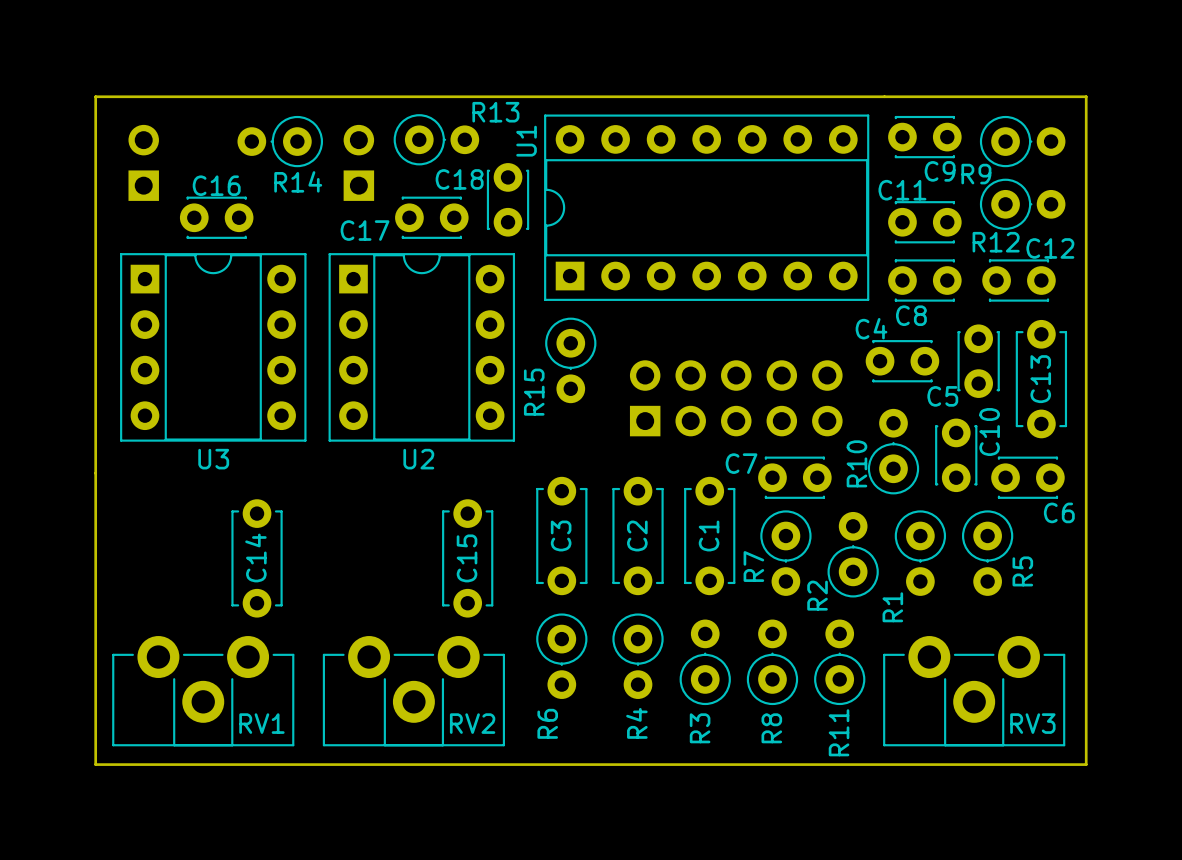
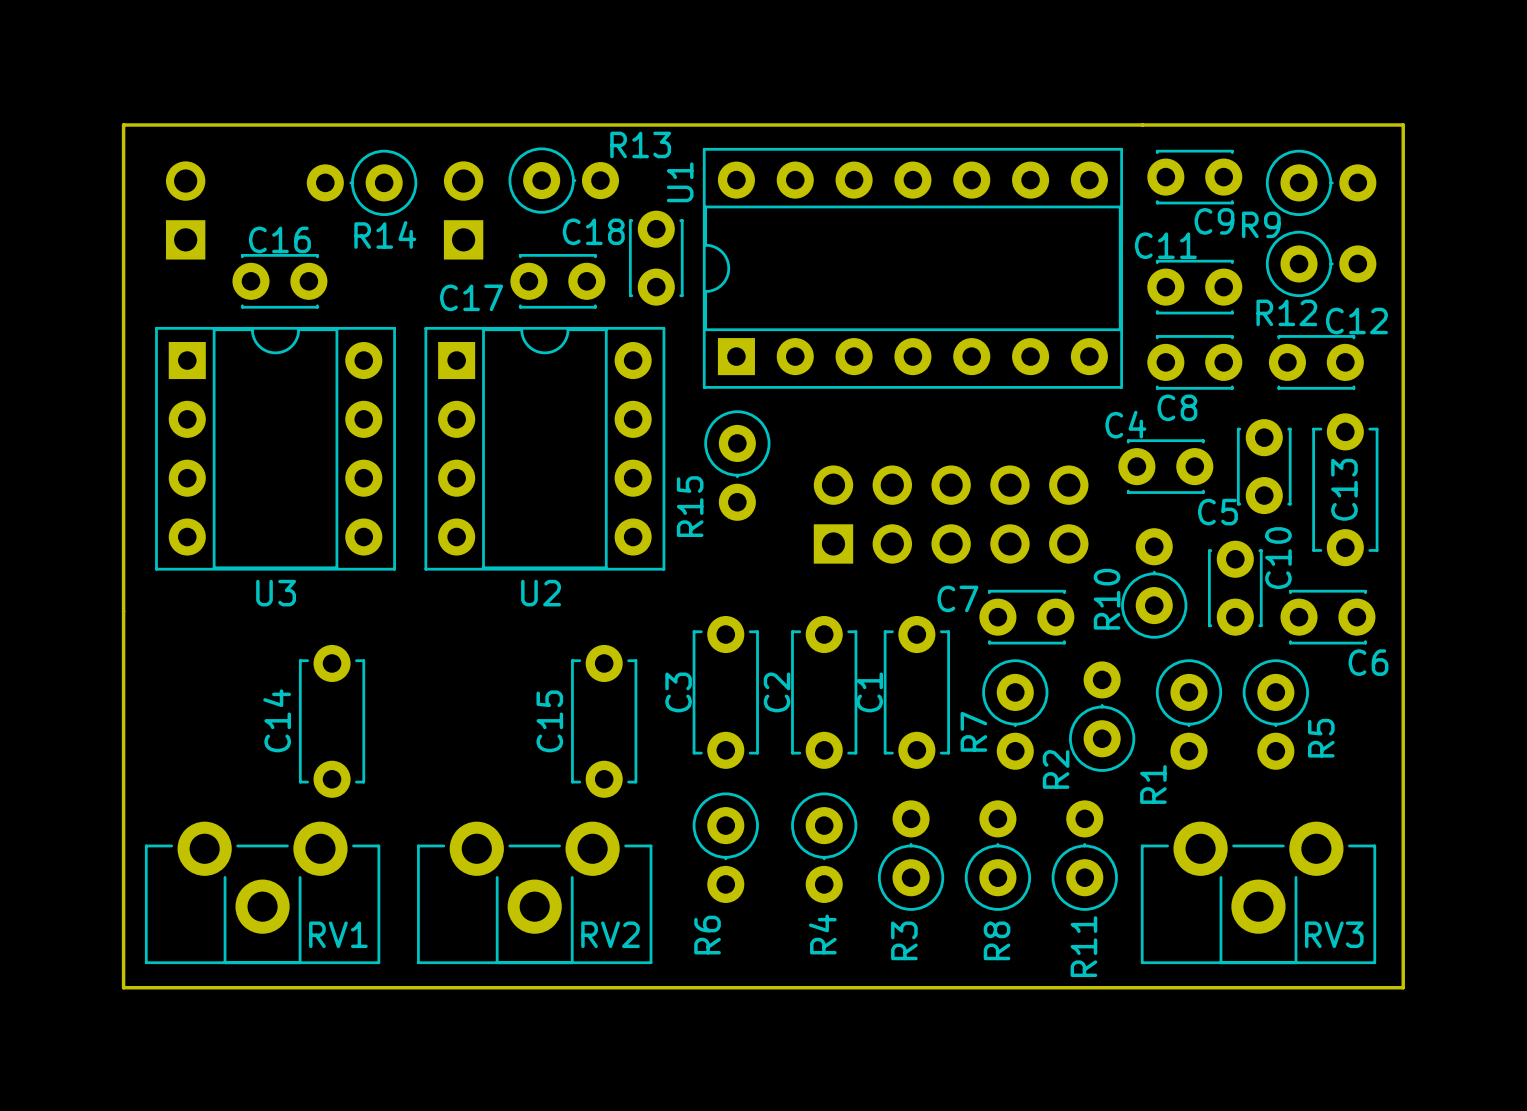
C3 name position: C3 (561, 536) -> C3 (678, 692)
C2 name position: C2 (637, 536) -> C2 (777, 692)
C1 name position: C1 (709, 536) -> C1 (869, 692)
C14 name position: C14 (255, 557) -> C14 (277, 720)
C15 name position: C15 (467, 558) -> C15 (549, 721)

